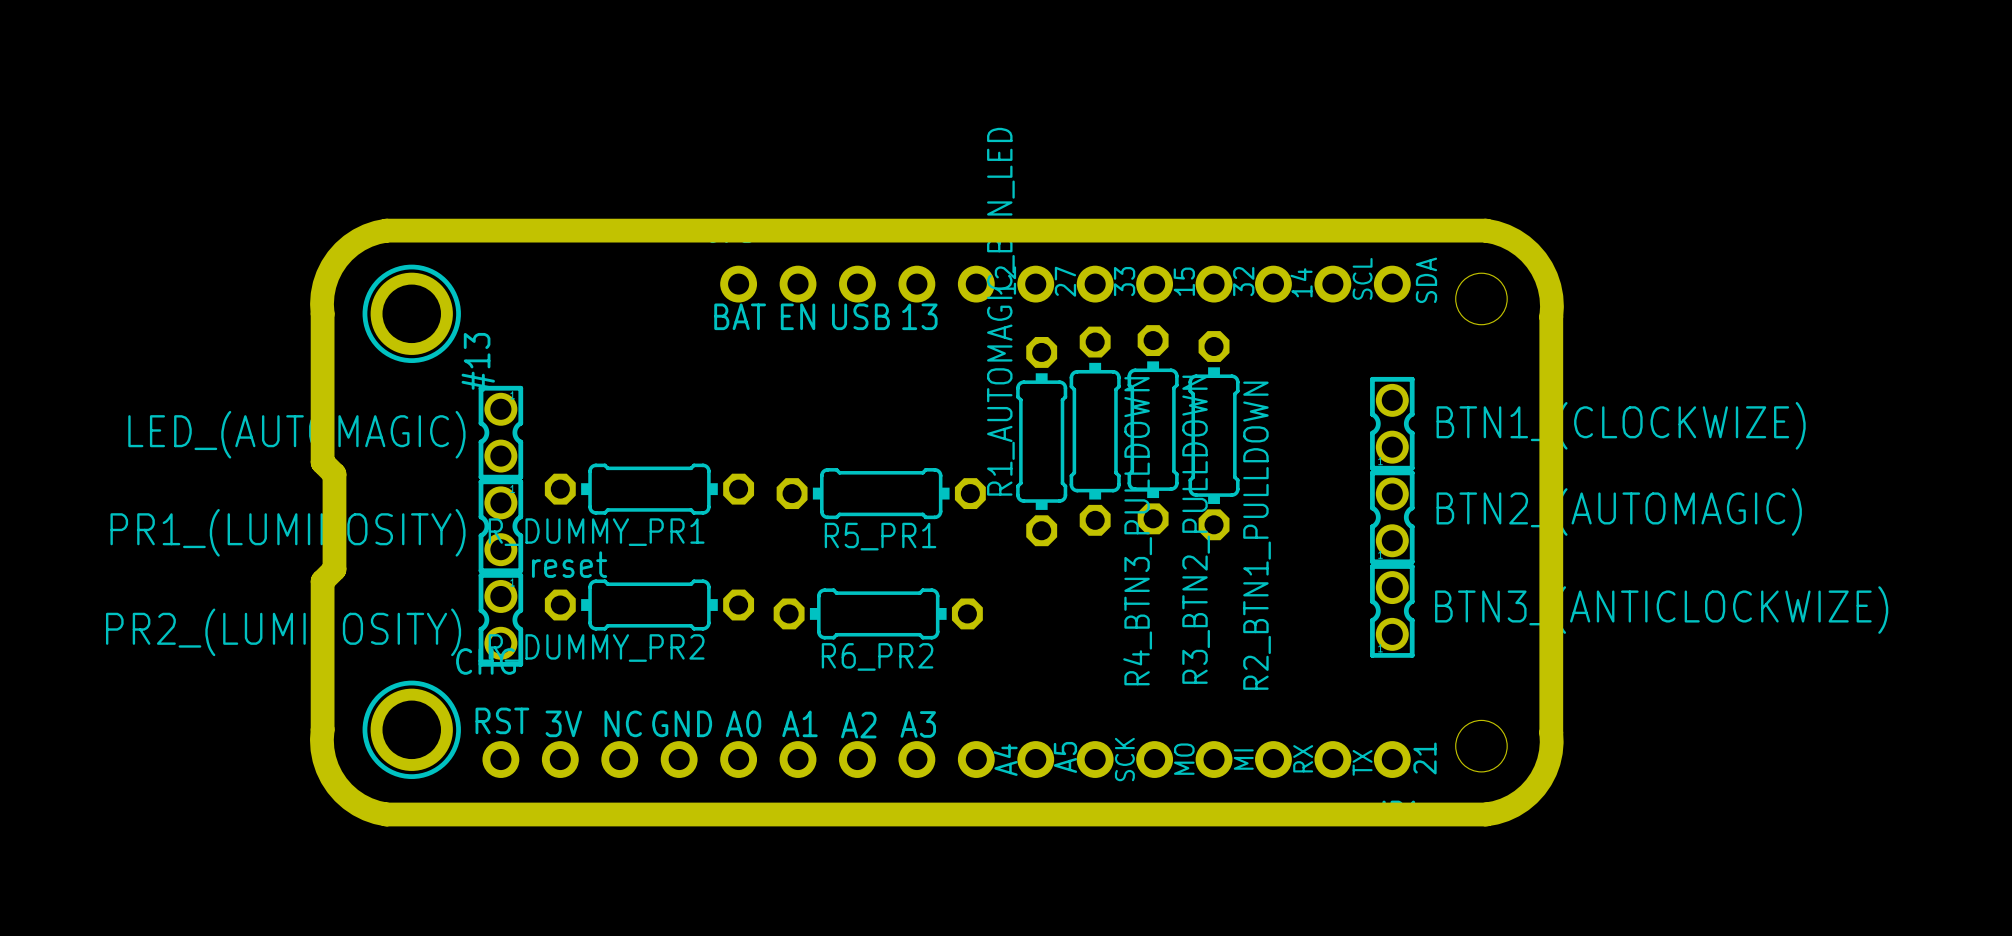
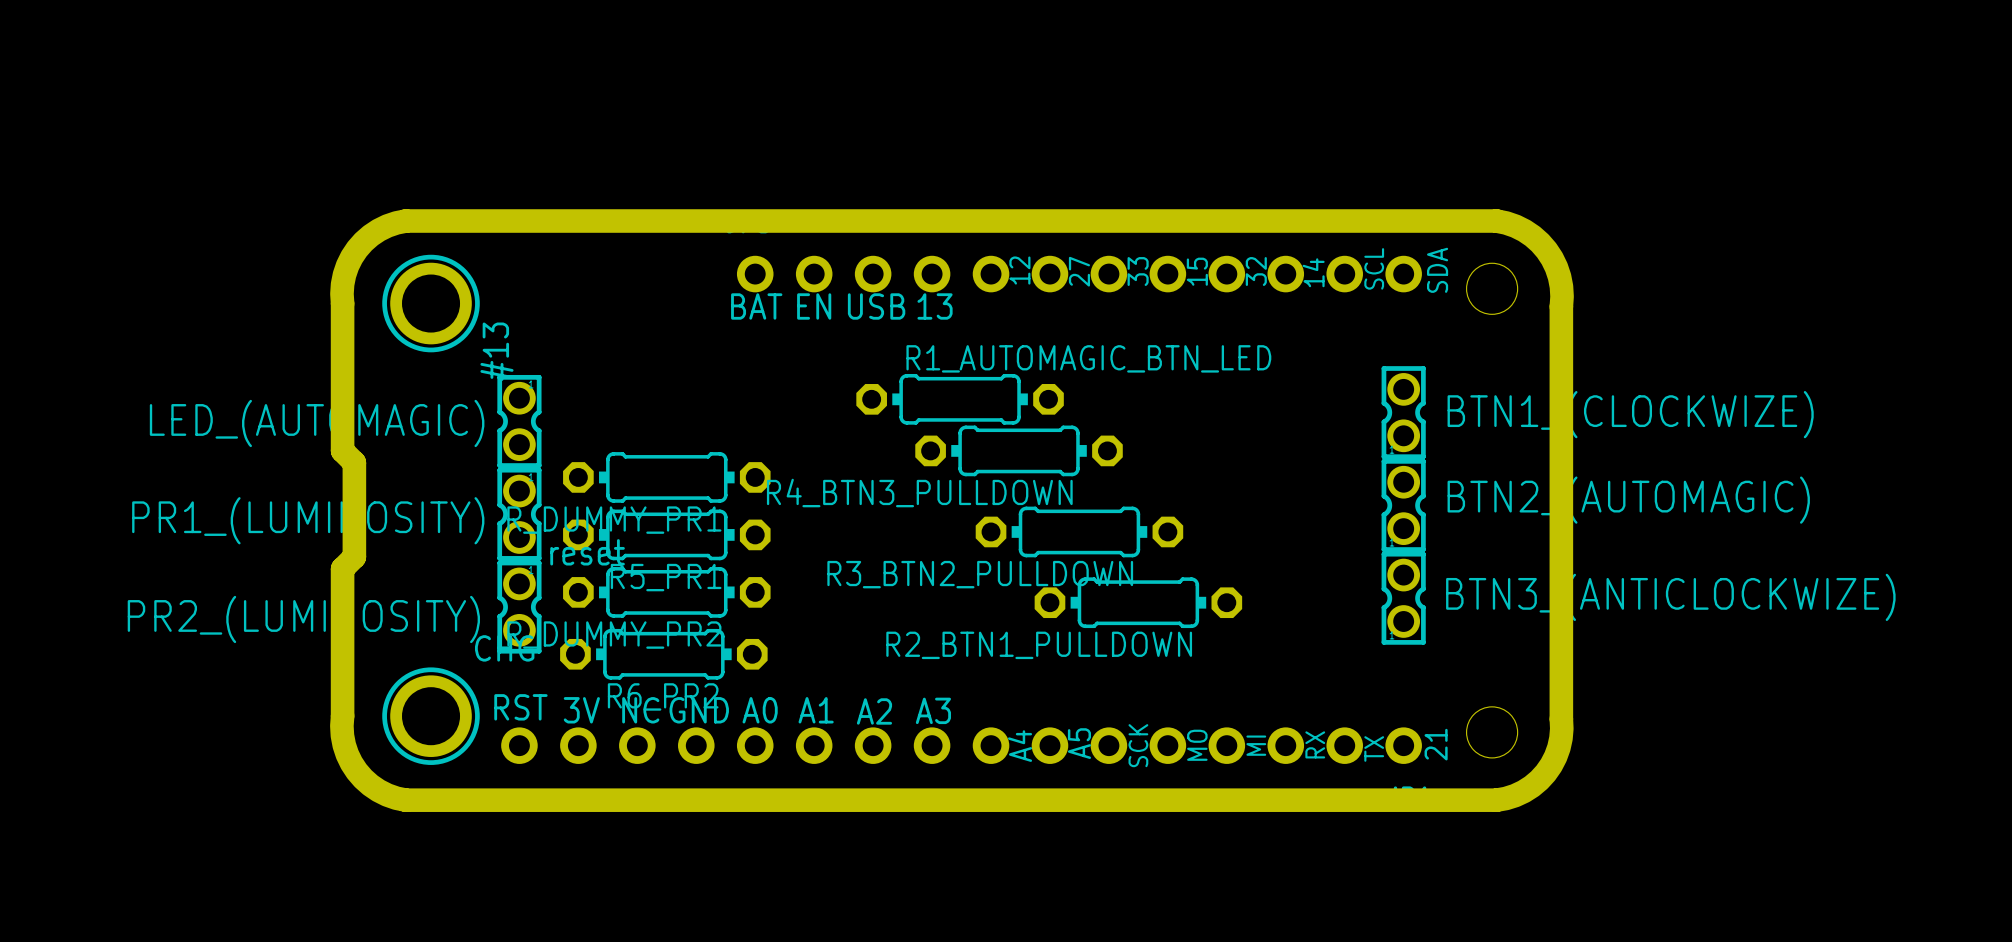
R3_BTN2_PULLDOWN rotation: 0° (1153, 429) -> 90° clockwise (1079, 531)
R3_BTN2_PULLDOWN position: (1153, 429) -> (1079, 531)
R4_BTN3_PULLDOWN rotation: 0° (1095, 431) -> 90° clockwise (1019, 450)
R2_BTN1_PULLDOWN rotation: 0° (1214, 435) -> 90° clockwise (1138, 602)
R2_BTN1_PULLDOWN position: (1214, 435) -> (1138, 602)
R1_AUTOMAGIC_BTN_LED rotation: 0° (1041, 441) -> 90° clockwise (960, 399)
R5_PR1 position: (881, 493) -> (666, 534)
R6_PR2 position: (878, 613) -> (663, 654)

